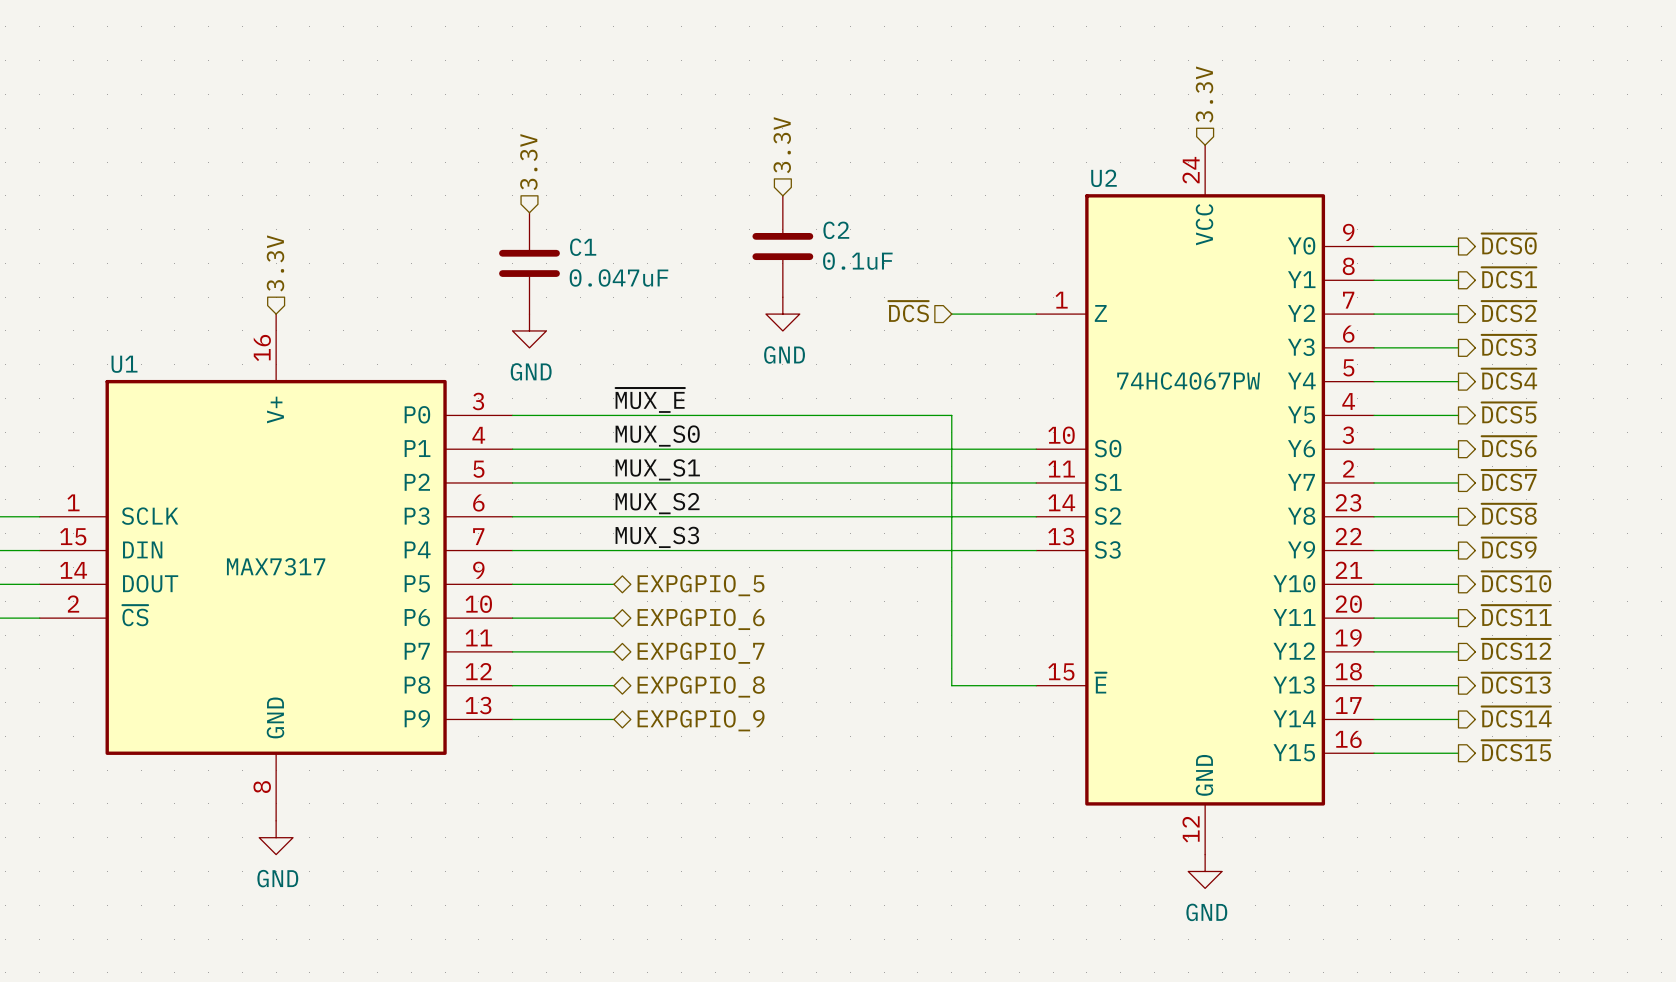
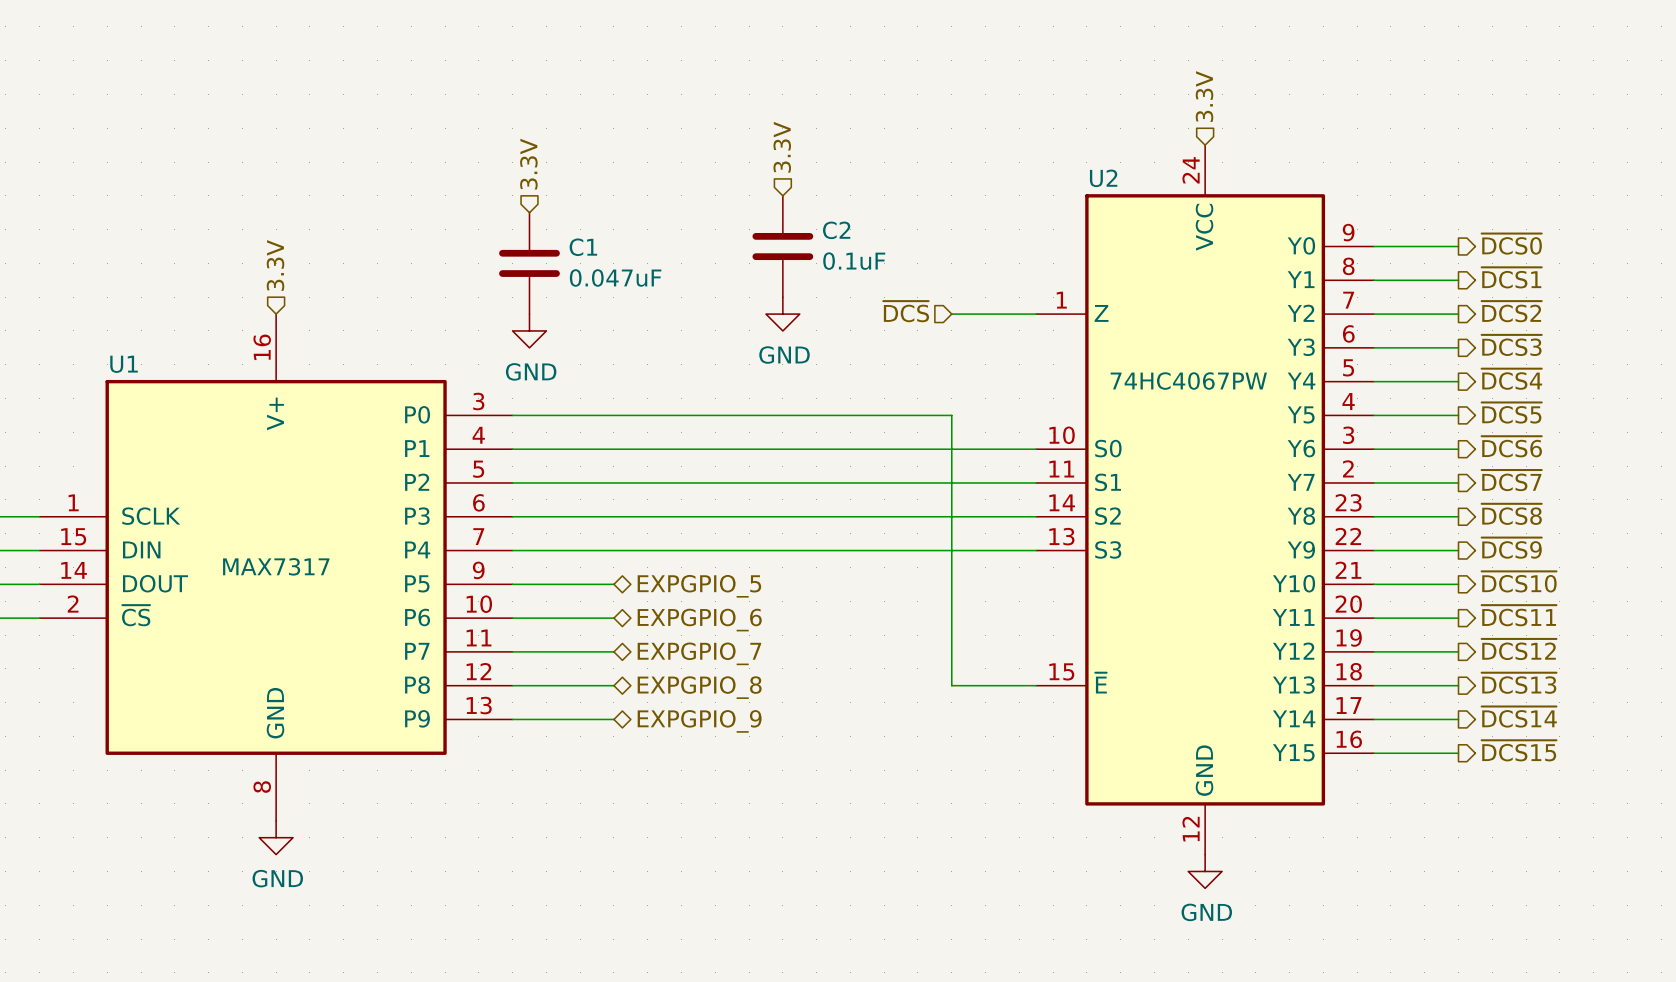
label: ~{MUX_E} (650, 400) -> none
label: MUX_S0 (657, 436) -> none
label: MUX_S1 (657, 469) -> none
label: MUX_S2 (657, 503) -> none
label: MUX_S3 (657, 537) -> none

